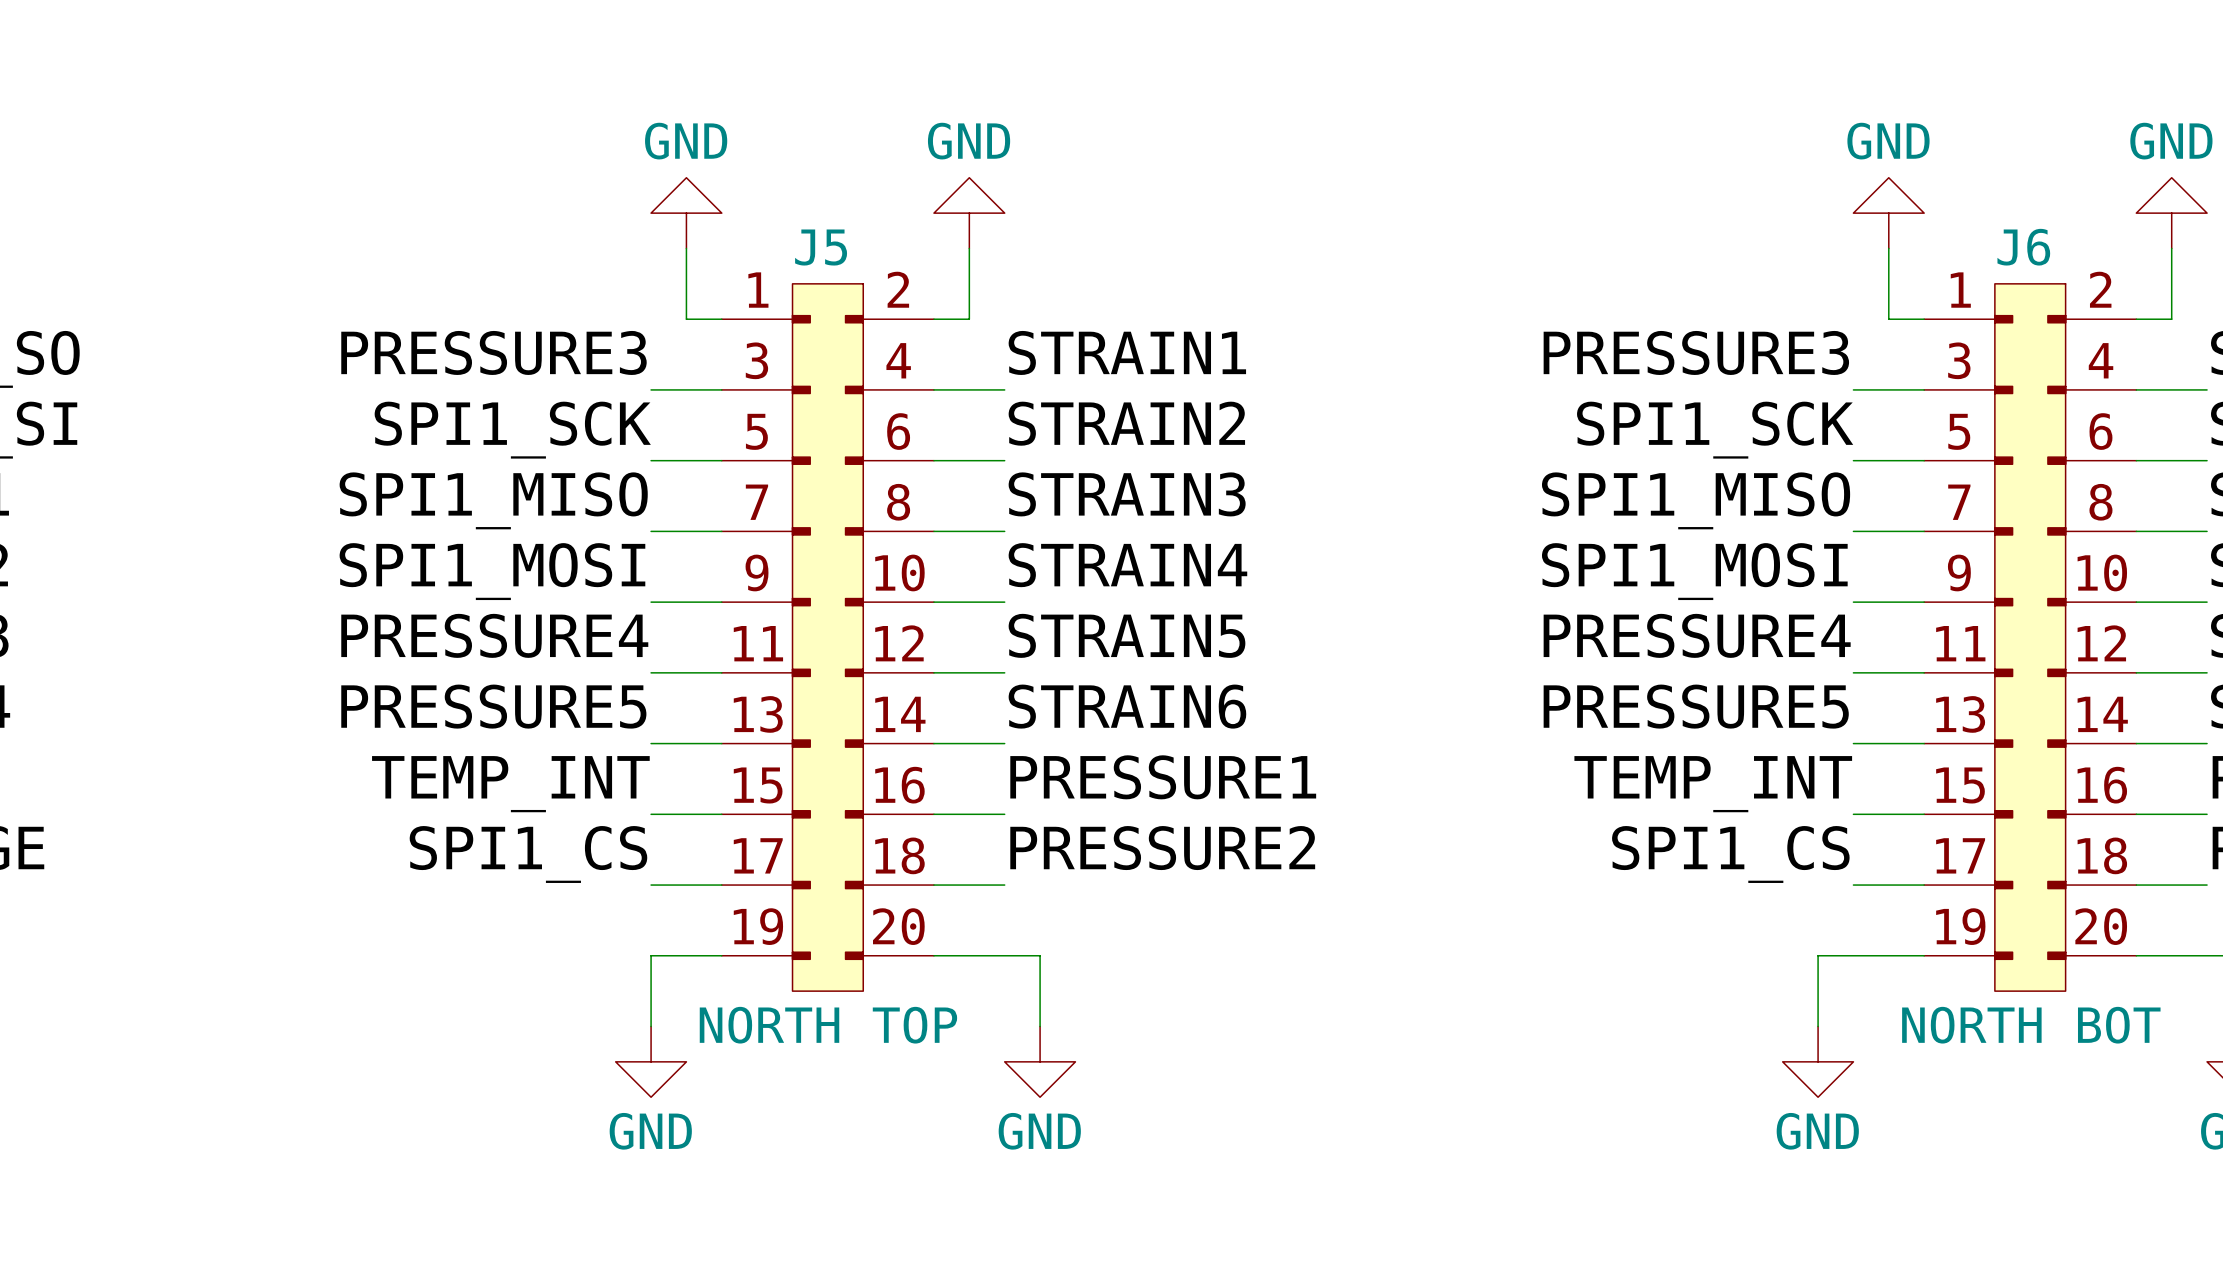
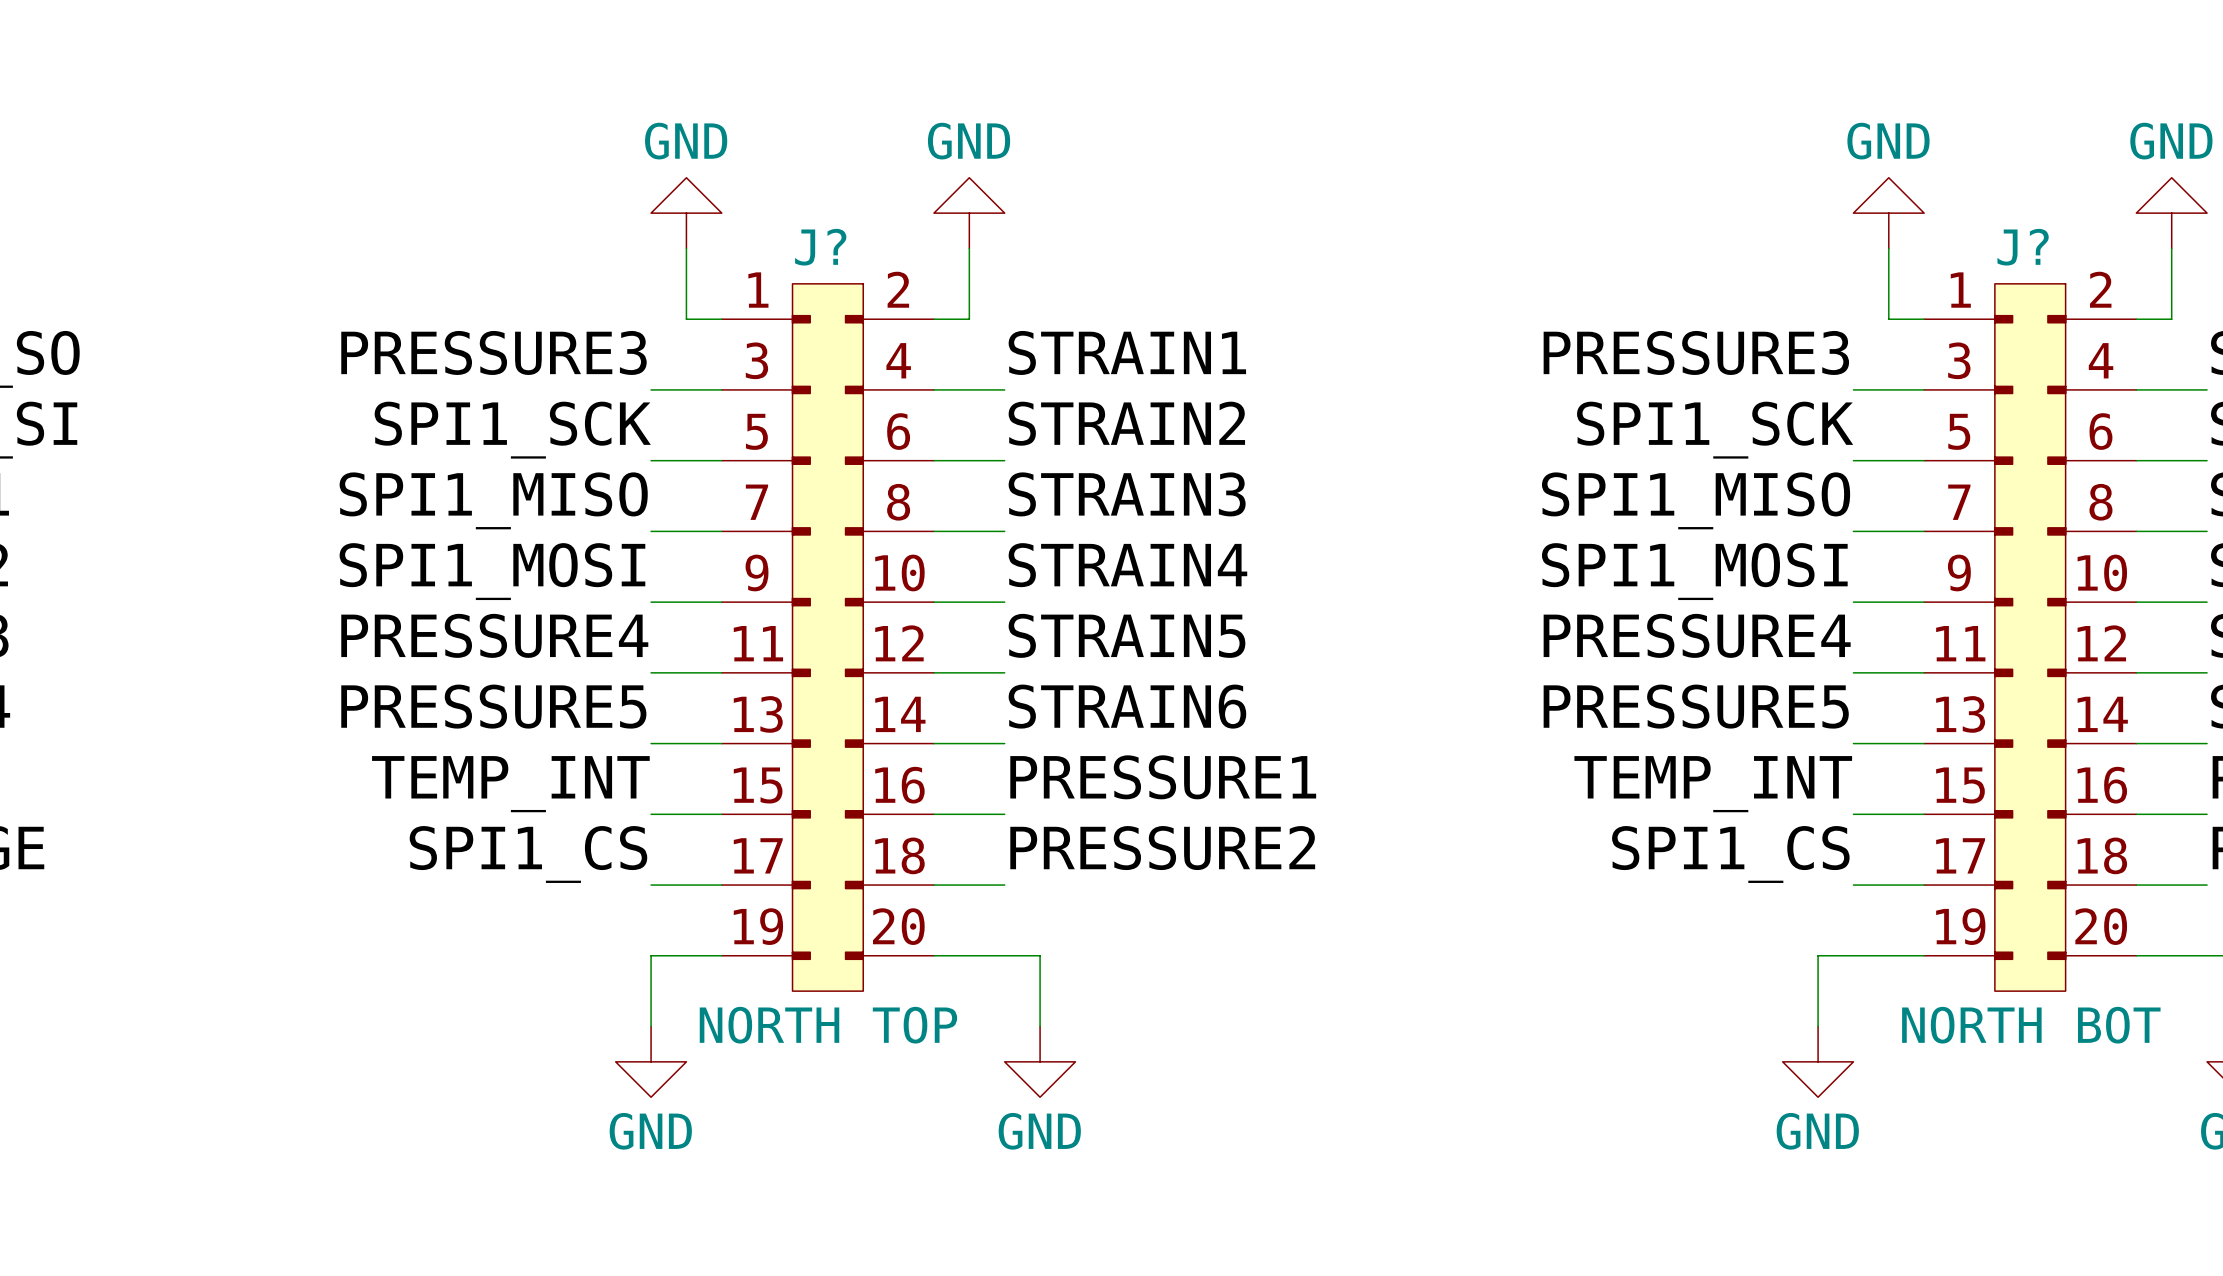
J5 name: J5 (821, 247) -> J? (820, 247)
J6 name: J6 (2023, 247) -> J? (2023, 247)

